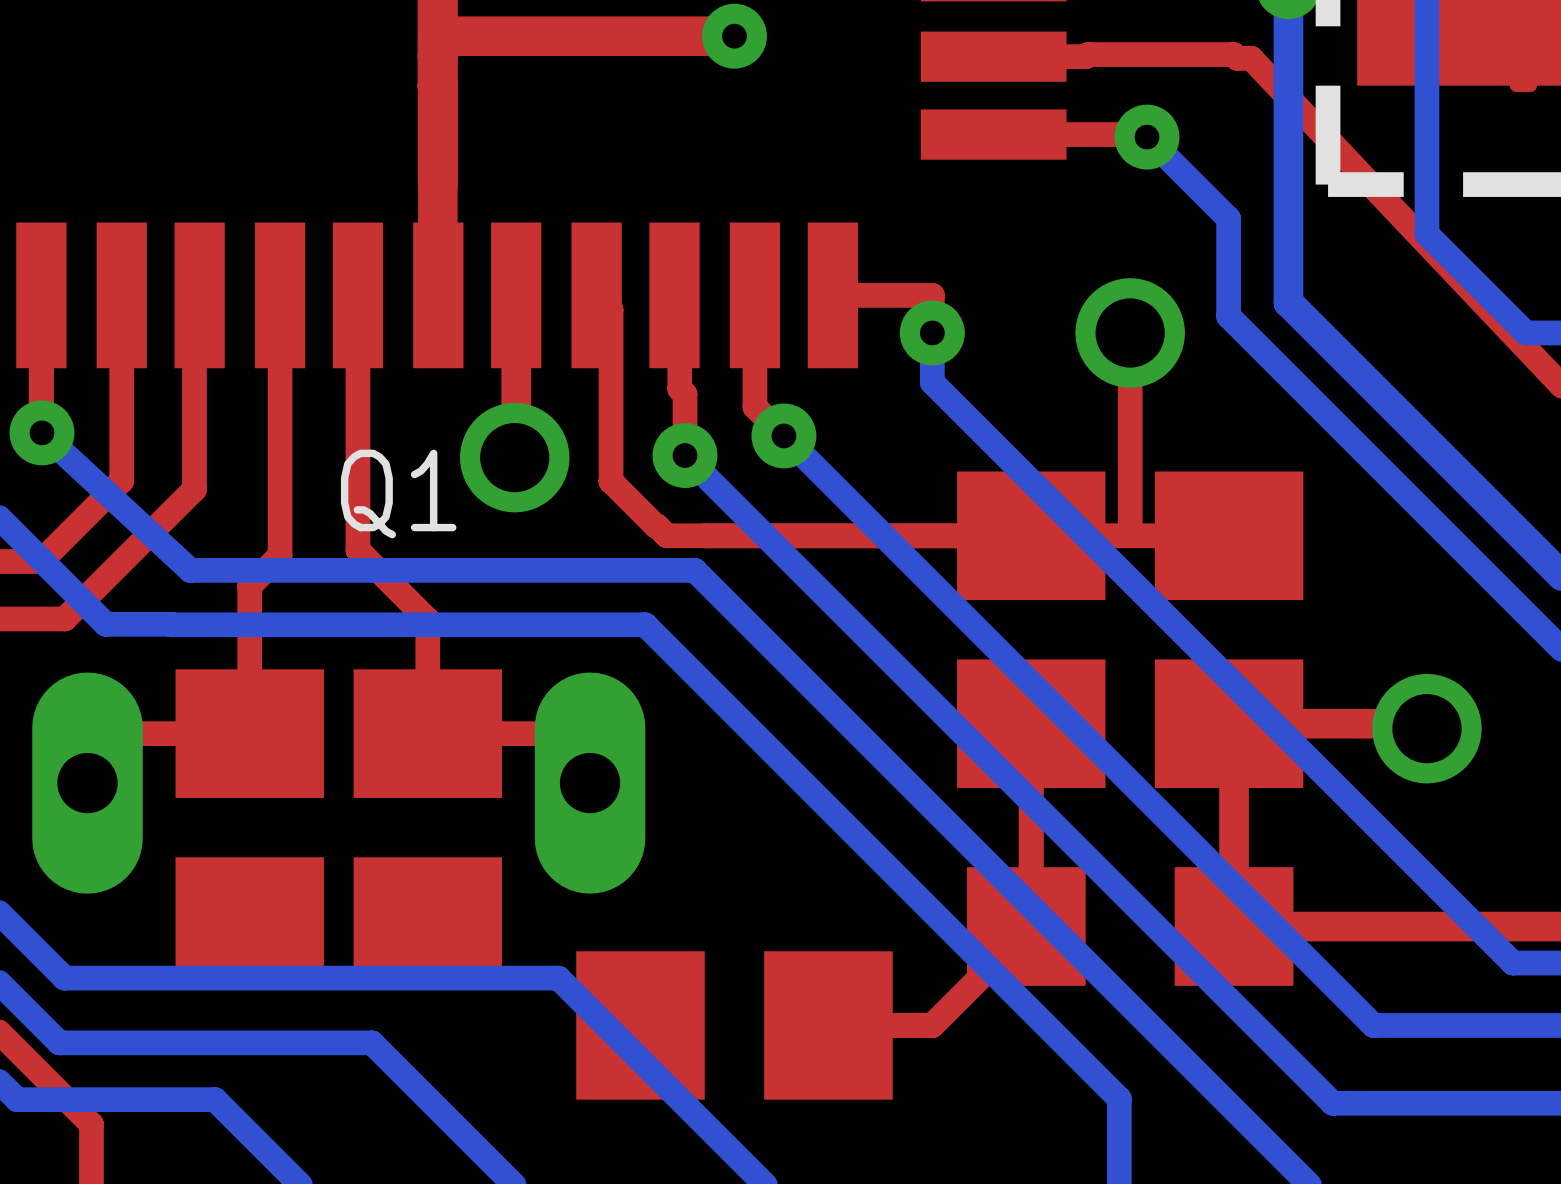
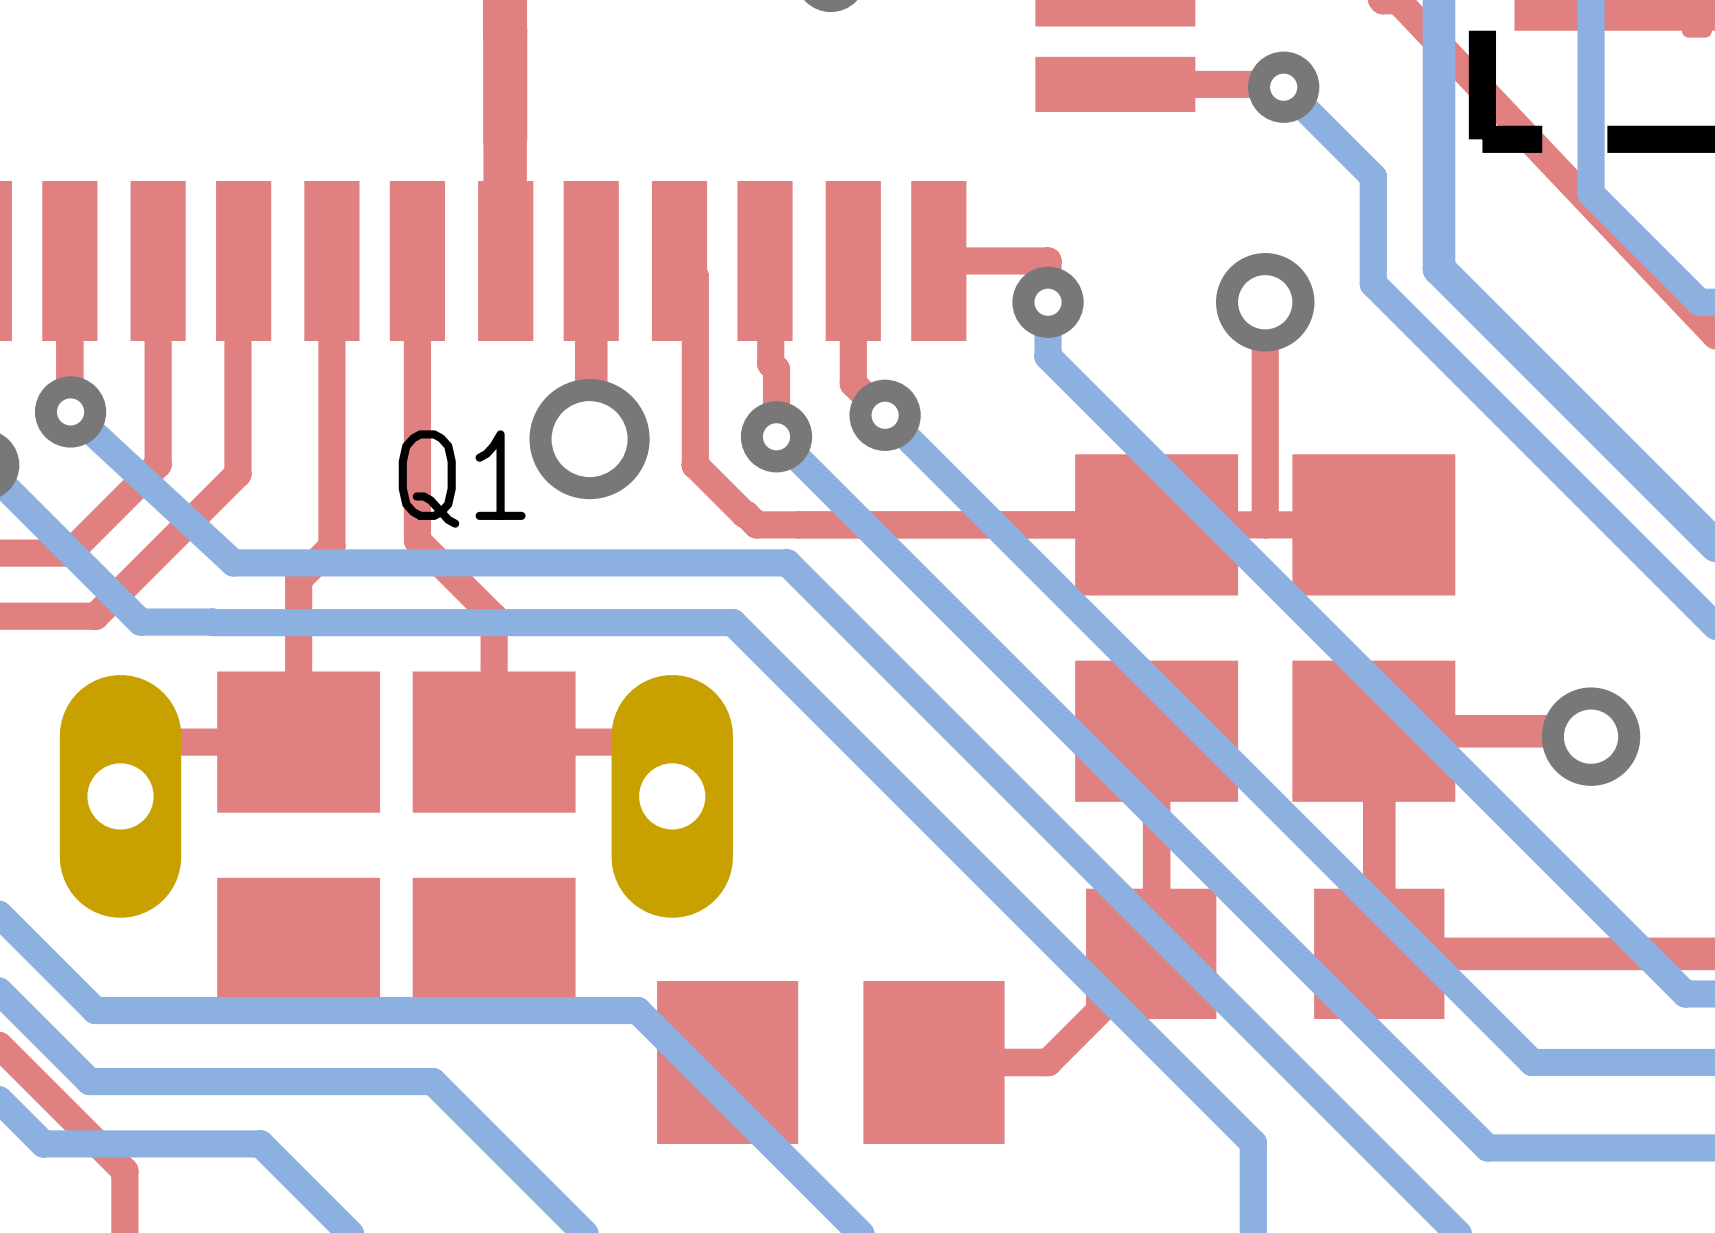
via size: [1075, 278, 1185, 388] -> [1216, 253, 1315, 352]
via size: [1372, 673, 1482, 784] -> [1541, 687, 1641, 786]

